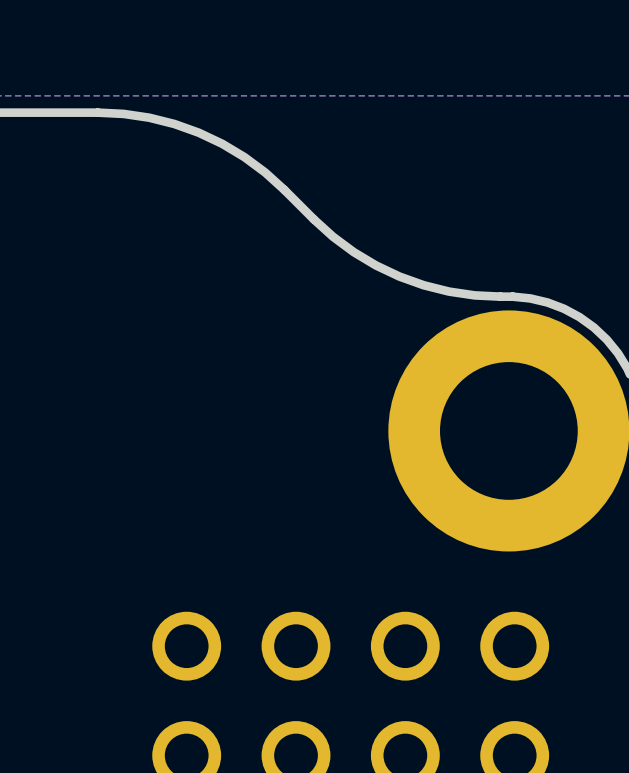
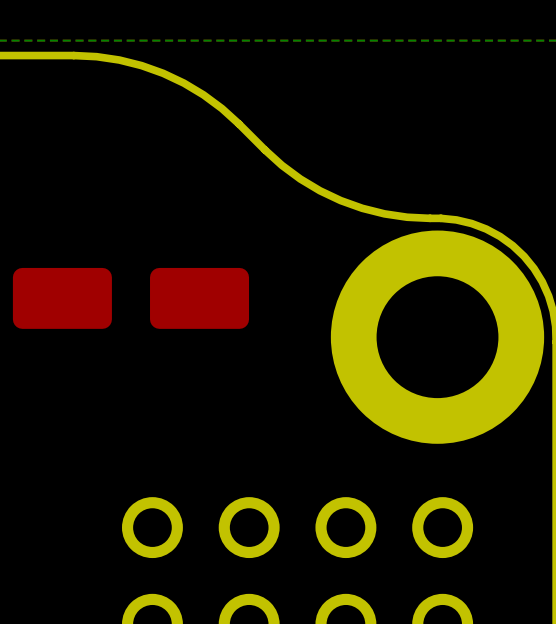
part: none -> (130, 298)

